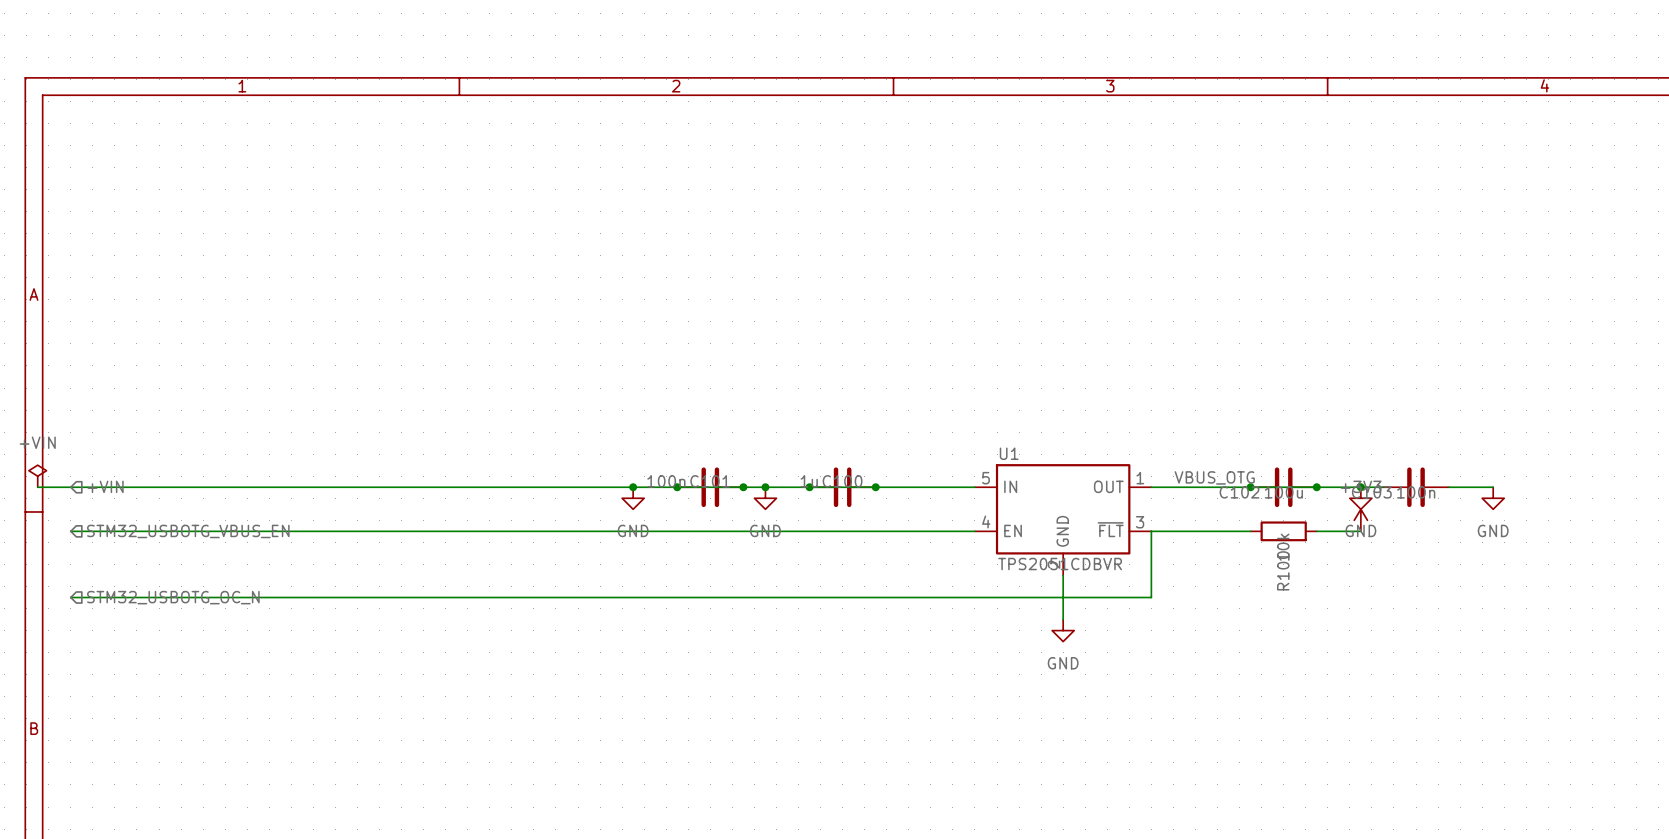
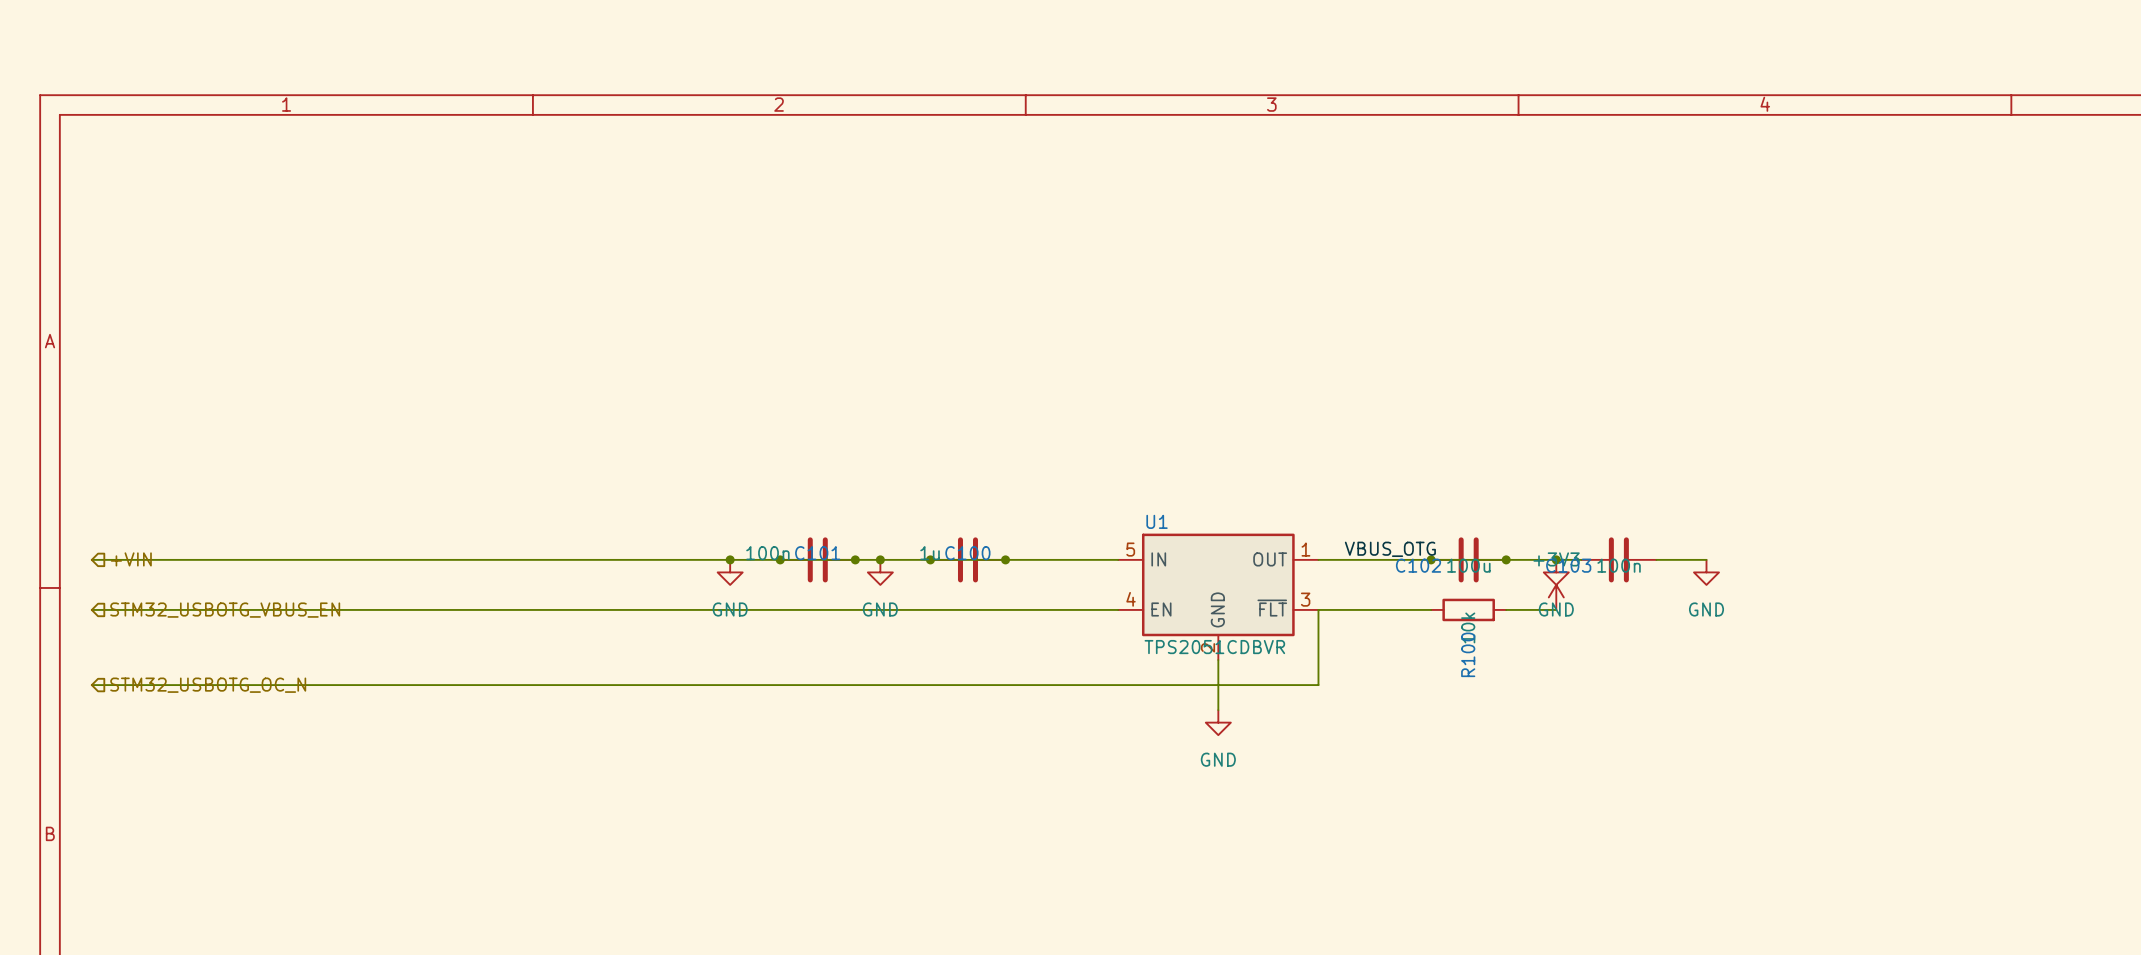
power symbol: +VIN (37, 476) -> none
wire: (37, 487) (70, 487) -> none

